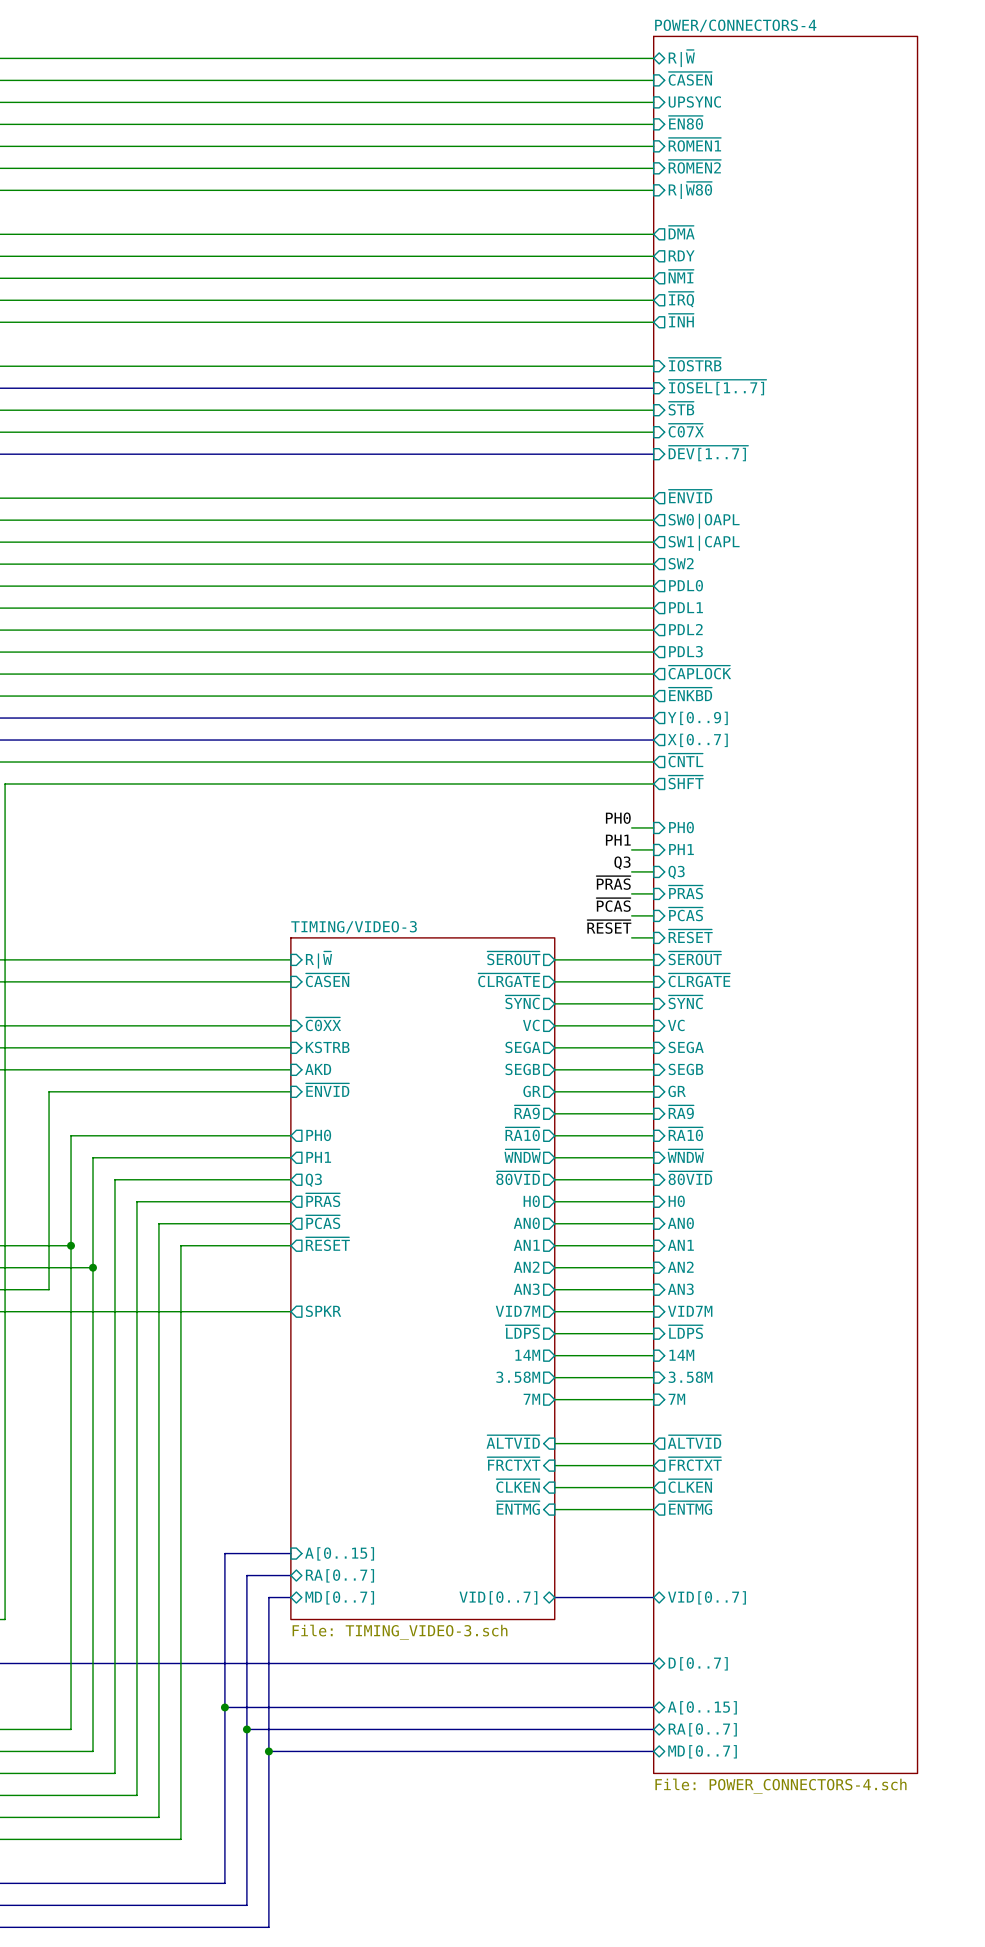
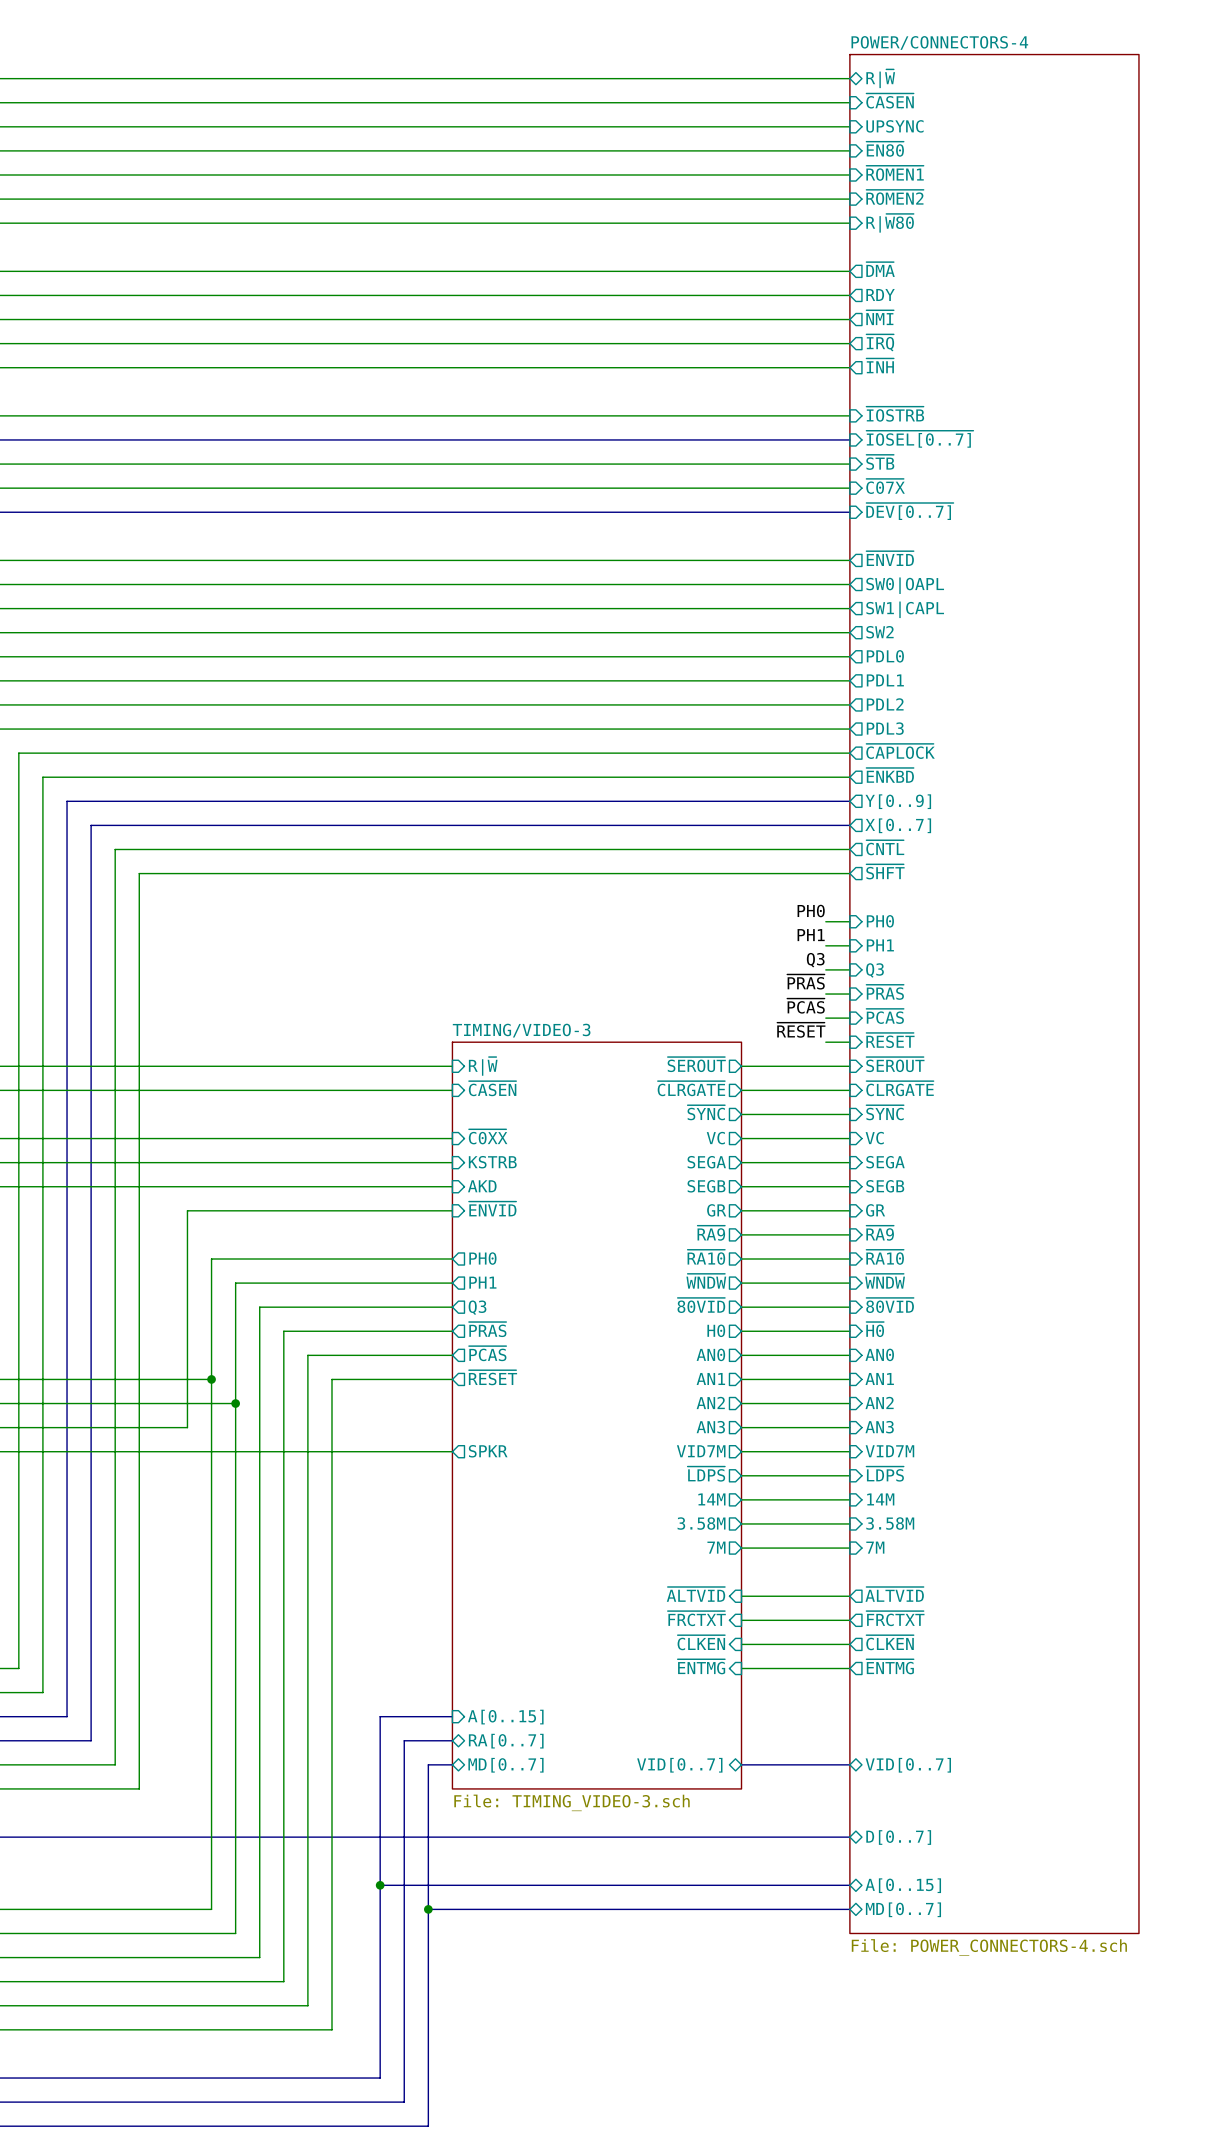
sheet POWER/CONNECTORS-4 shape: [653, 36, 918, 1774] -> [849, 54, 1139, 1934]
sheet pin: ~{IOSEL[1..7]} (717, 387) -> ~{IOSEL[0..7]} (919, 439)
sheet pin: ~{DEV[1..7]} (708, 453) -> ~{DEV[0..7]} (909, 511)
sheet pin: H0 (676, 1201) -> ~{H0} (875, 1329)
bus: (246, 1729) (268, 1729) -> none
junction: (246, 1729) -> none
junction: none -> (428, 1909)
sheet pin: RA[0..7] (702, 1729) -> MD[0..7] (903, 1909)
bus: (268, 1751) (653, 1751) -> none
junction: (268, 1751) -> none
sheet pin: MD[0..7] (702, 1751) -> none

